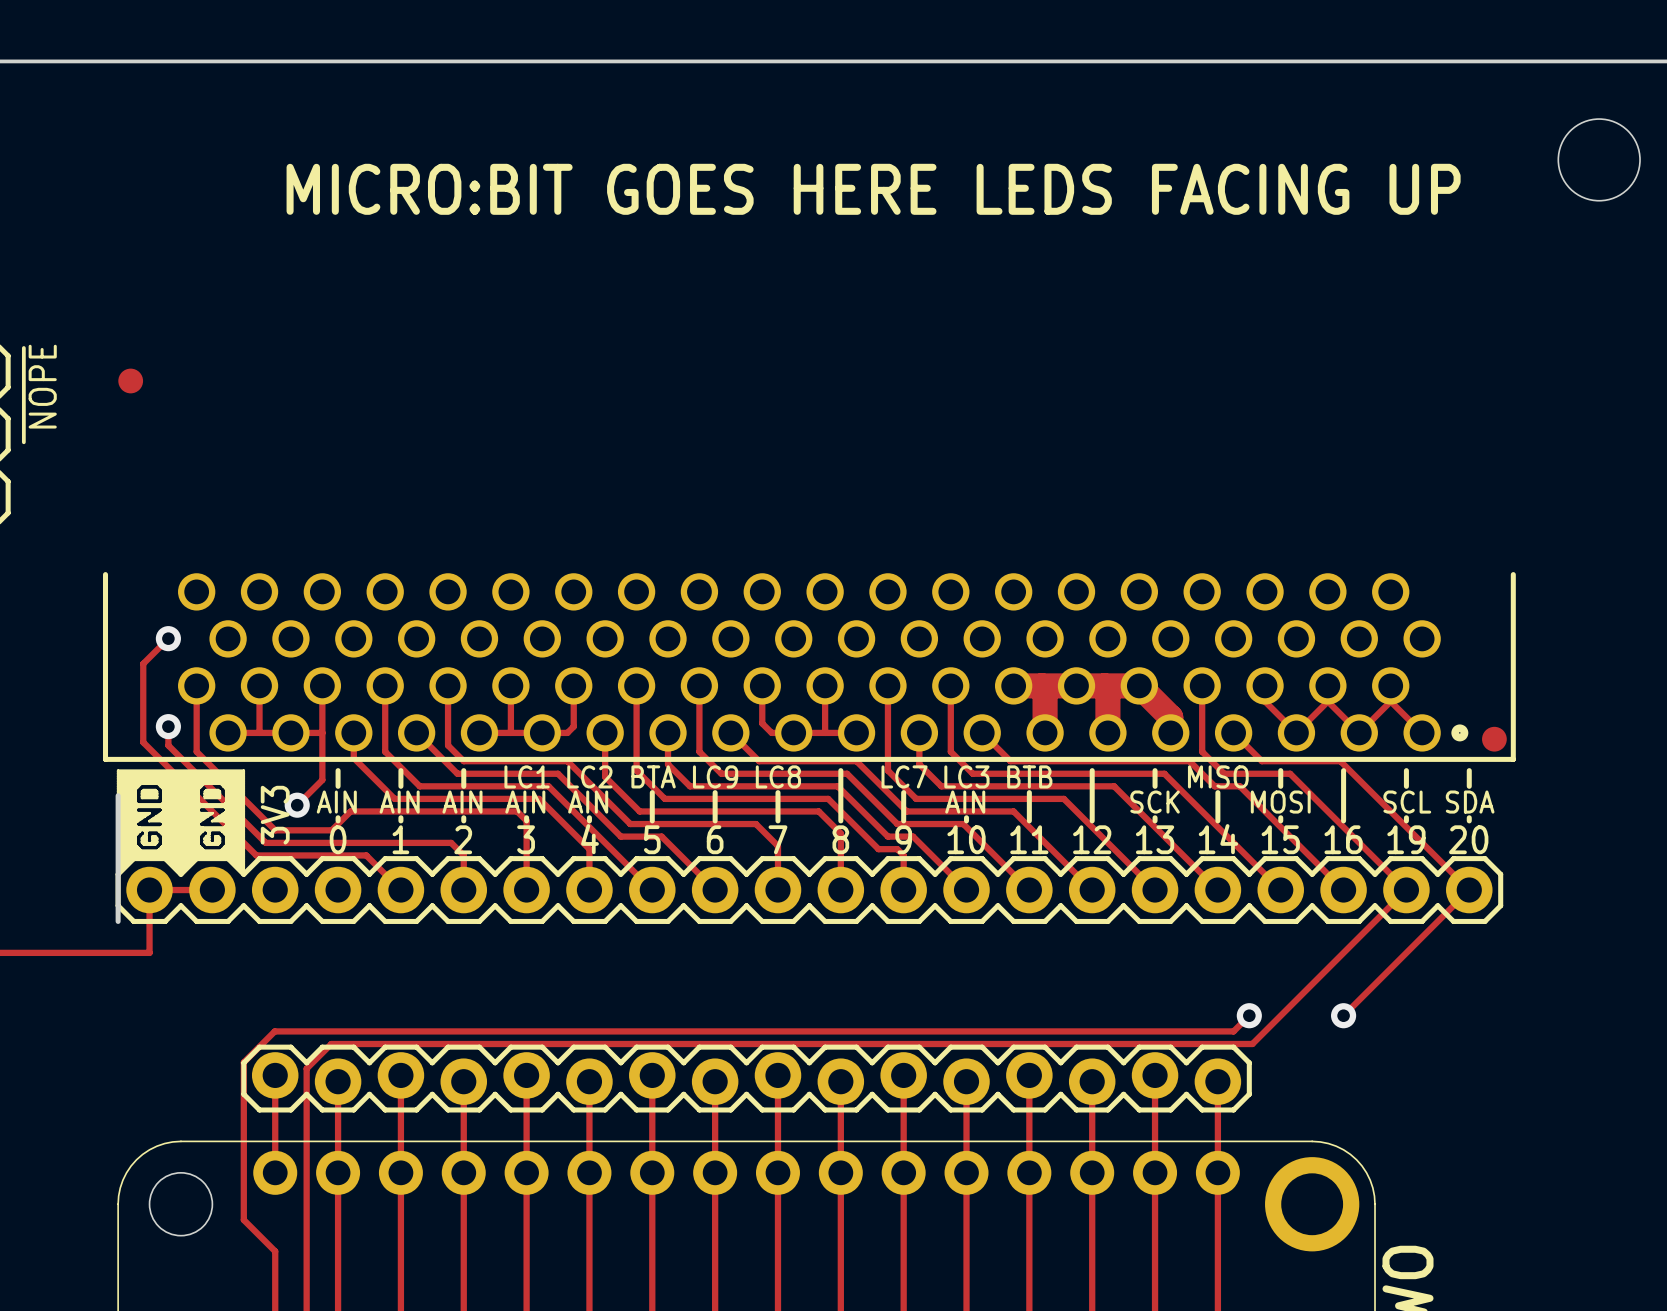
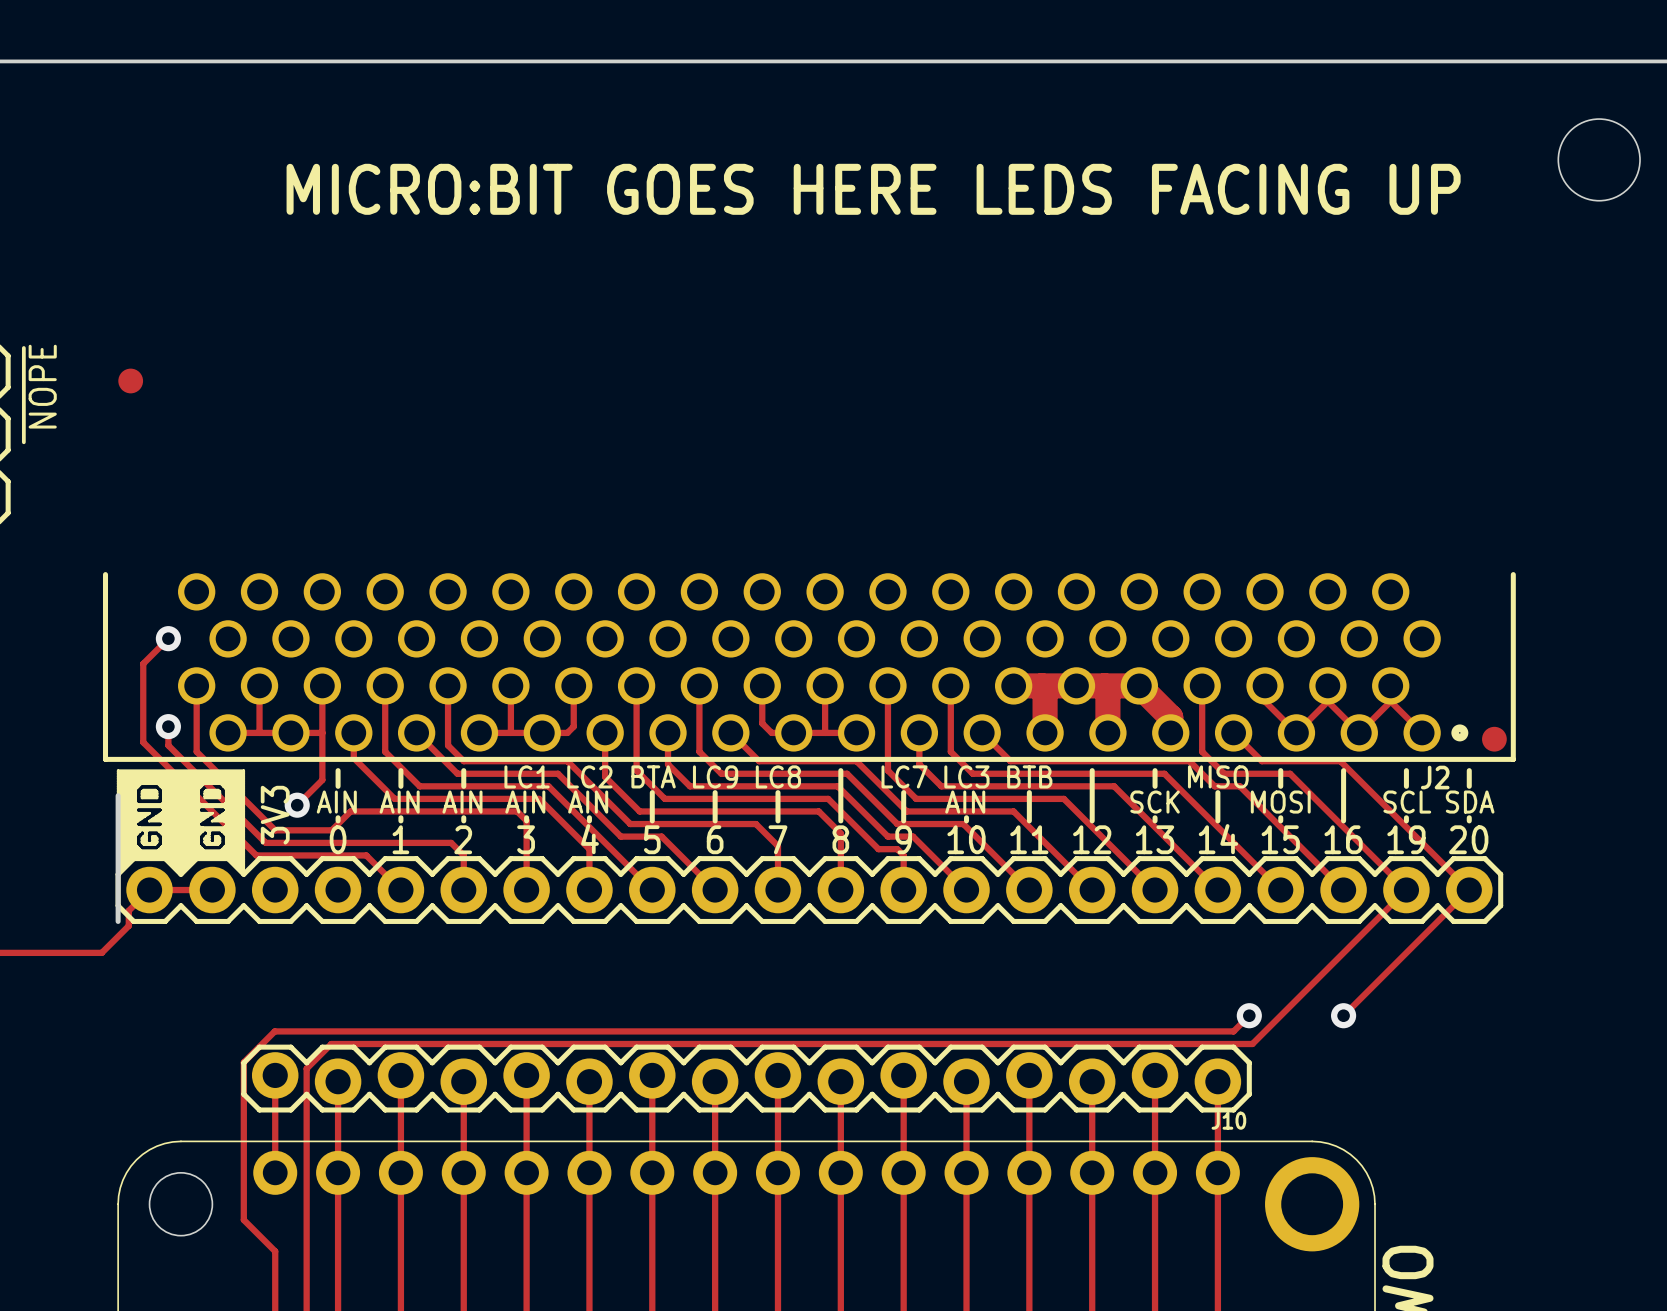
J2 name: none -> J2 (1435, 777)
track: (149, 890) (149, 952) (101, 952) -> (149, 890) (128, 910) (128, 925) (101, 952)
J10 name: none -> J10 (1228, 1120)

